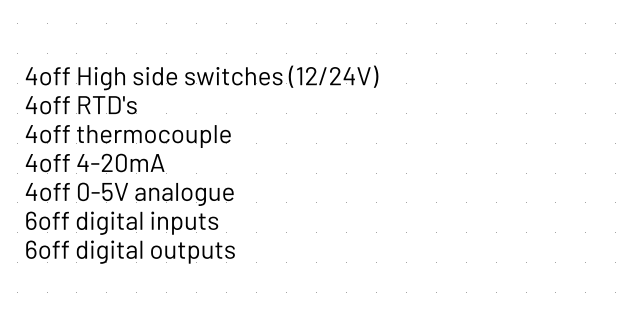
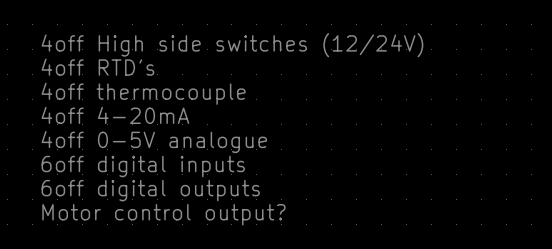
text: none -> Motor control output? (163, 214)

